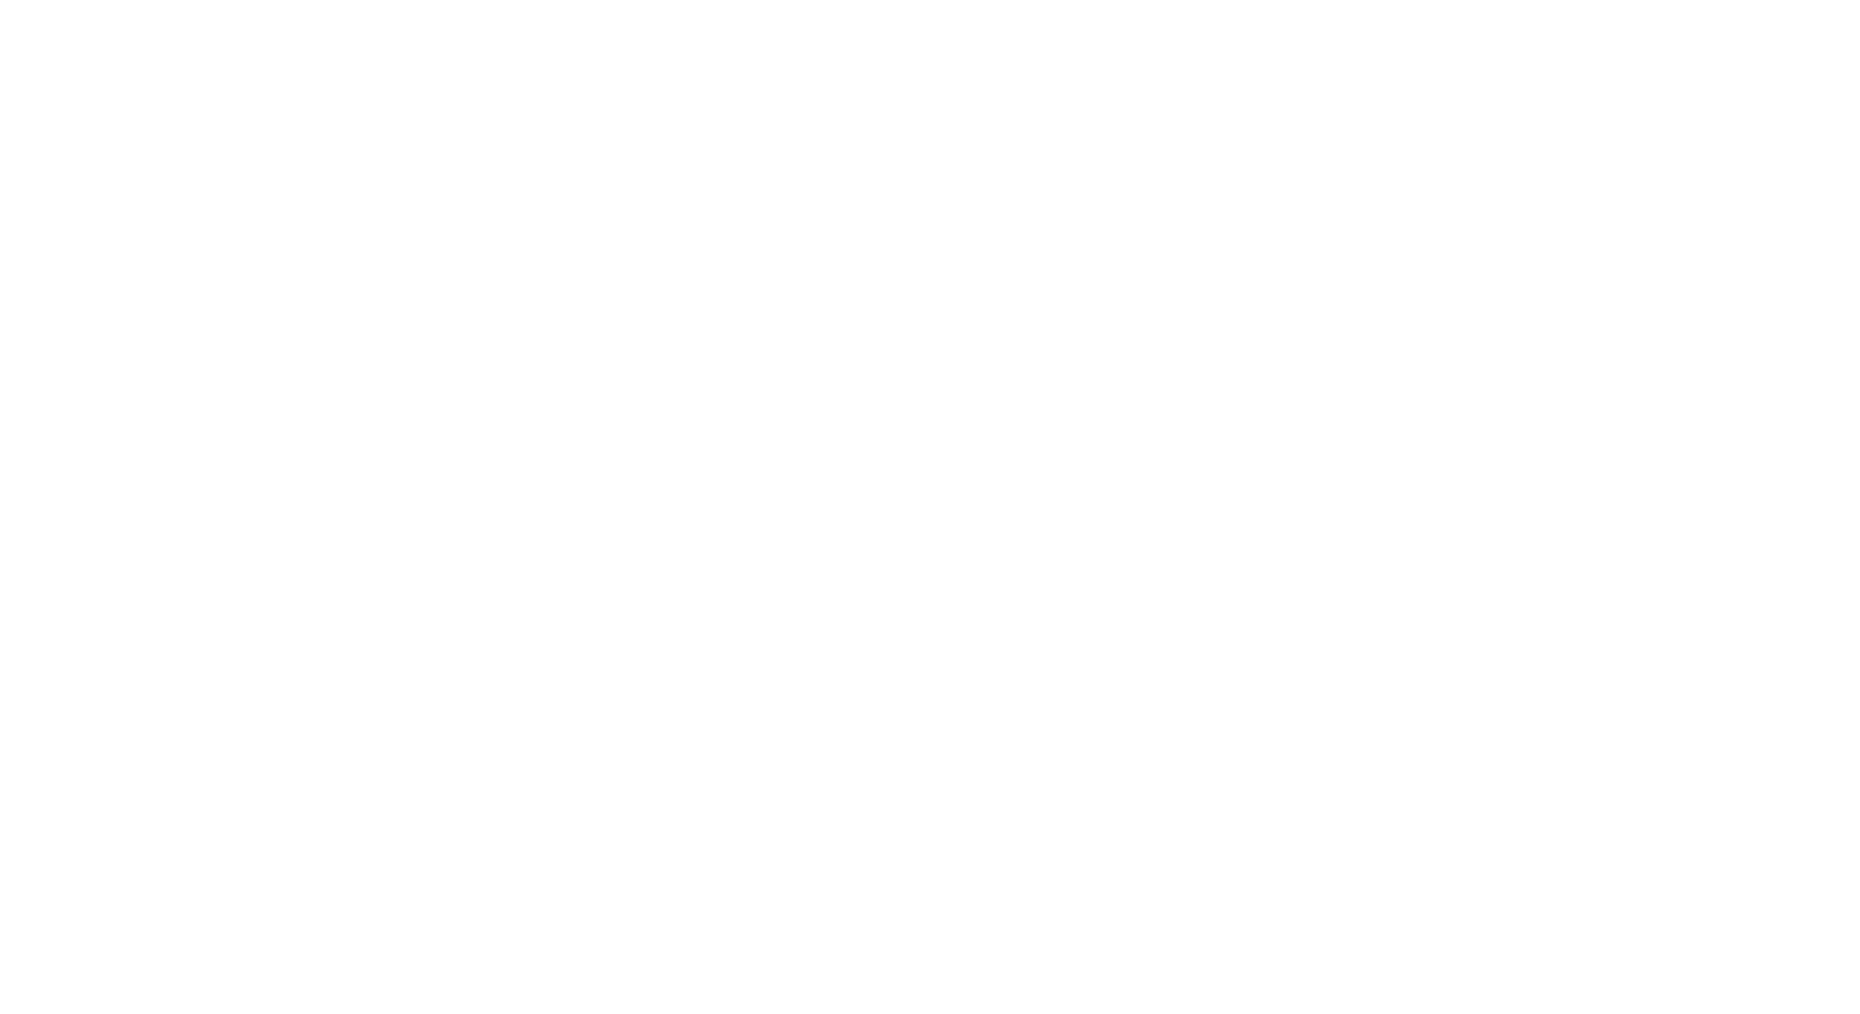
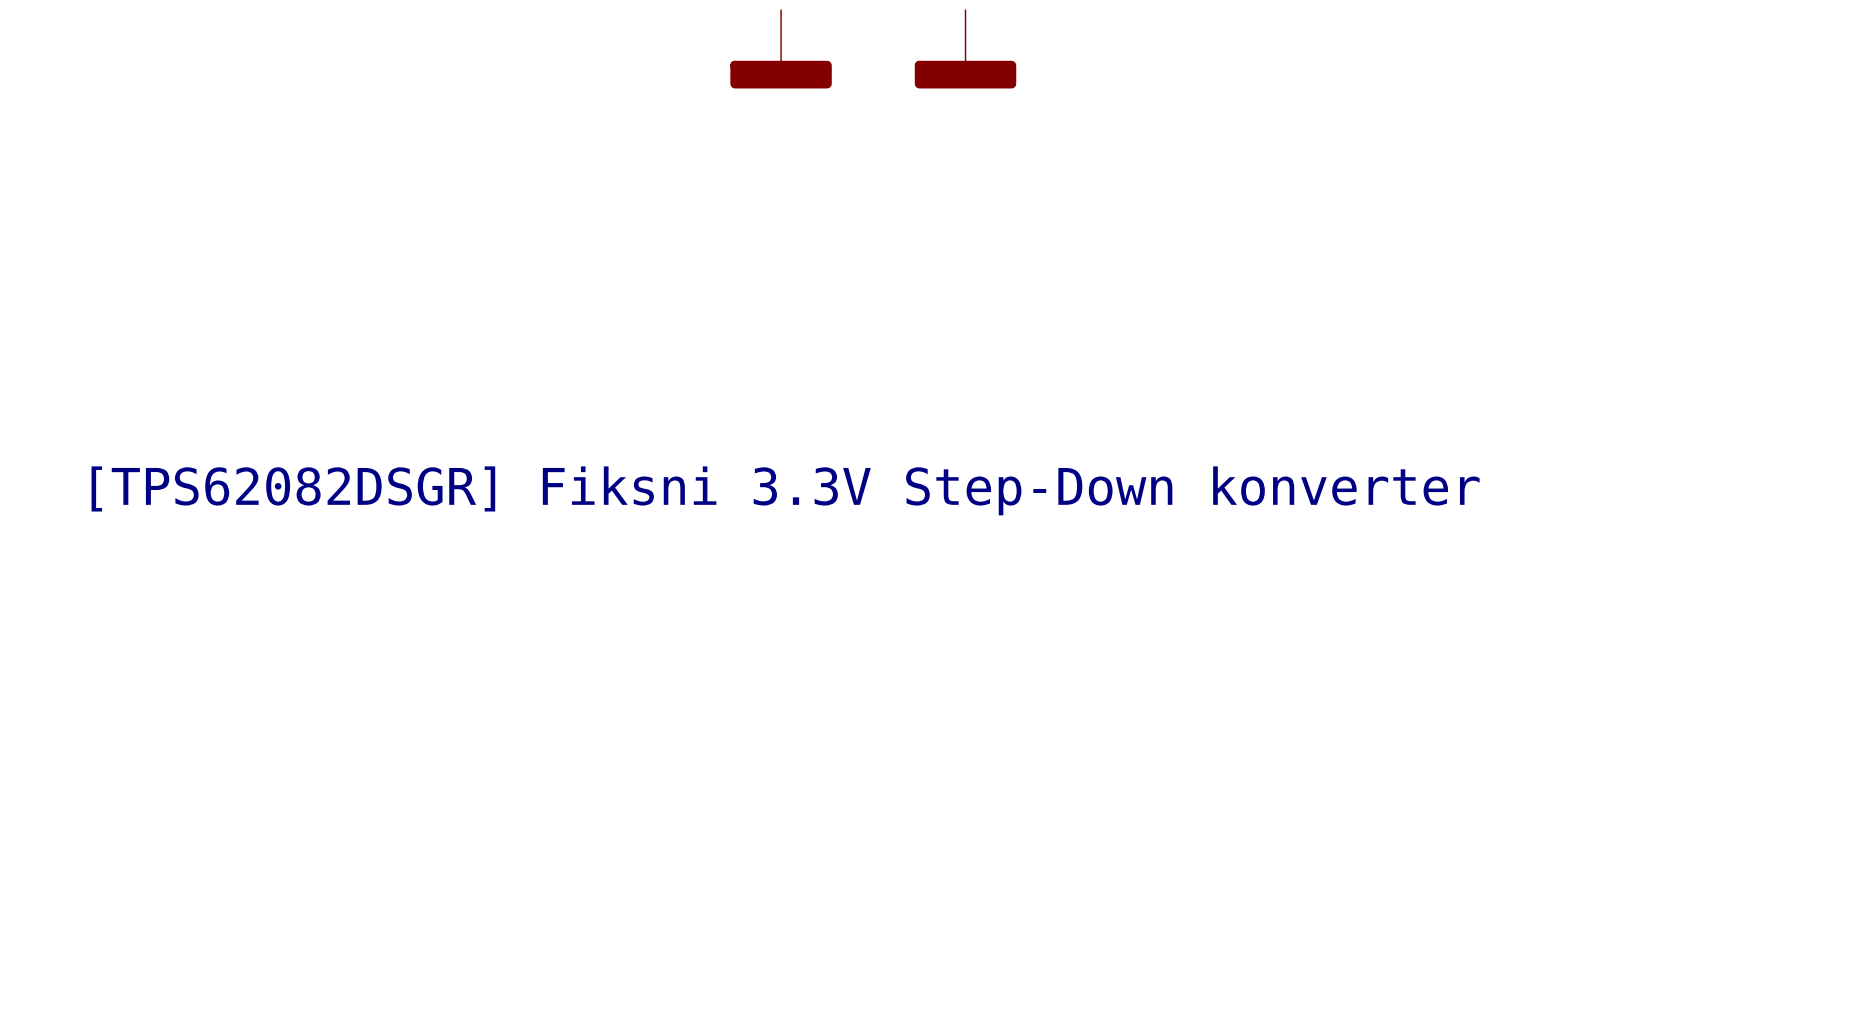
power symbol: none -> (781, 49)
power symbol: none -> (965, 49)
text: none -> [TPS62082DSGR] Fiksni 3.3V Step-Down konverter (785, 490)

